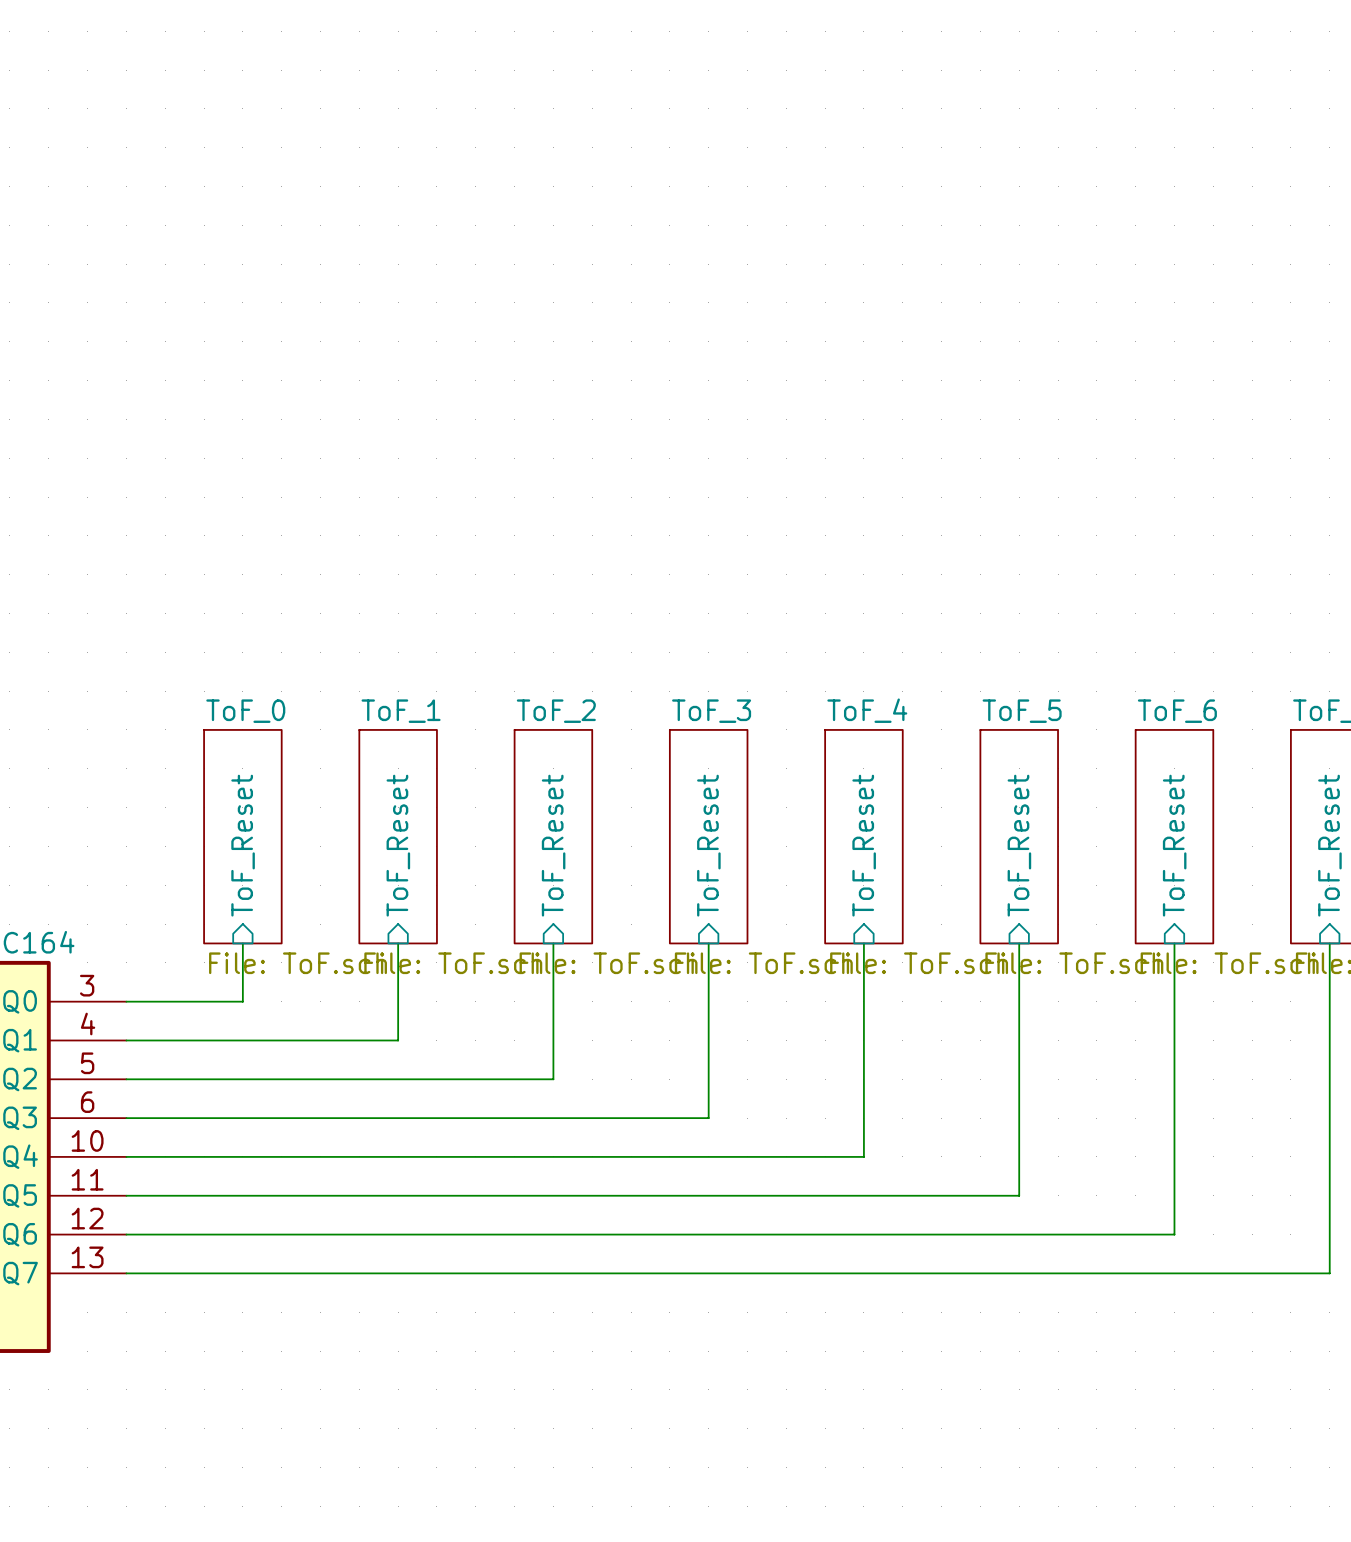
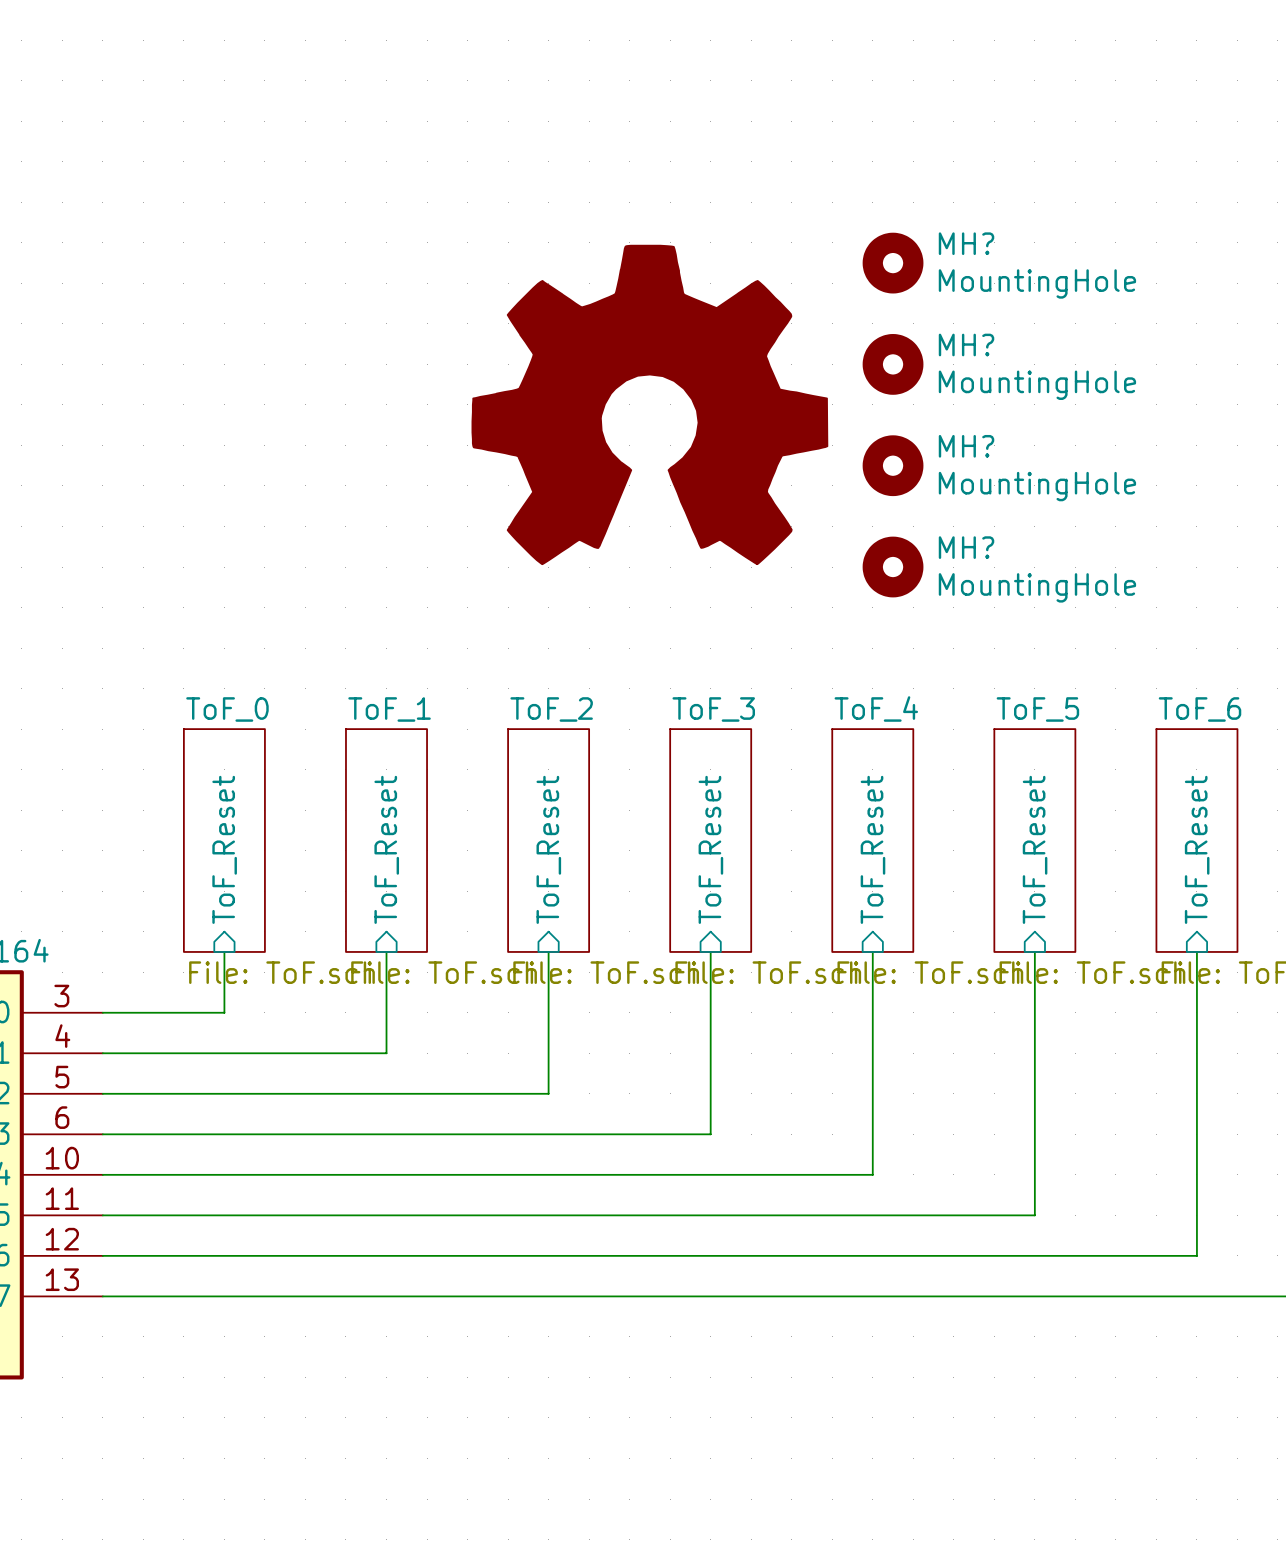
MH?: none -> MountingHole (893, 263)
MH?: none -> MountingHole (893, 364)
power symbol: none -> (649, 404)
MH?: none -> MountingHole (893, 465)
MH?: none -> MountingHole (893, 567)

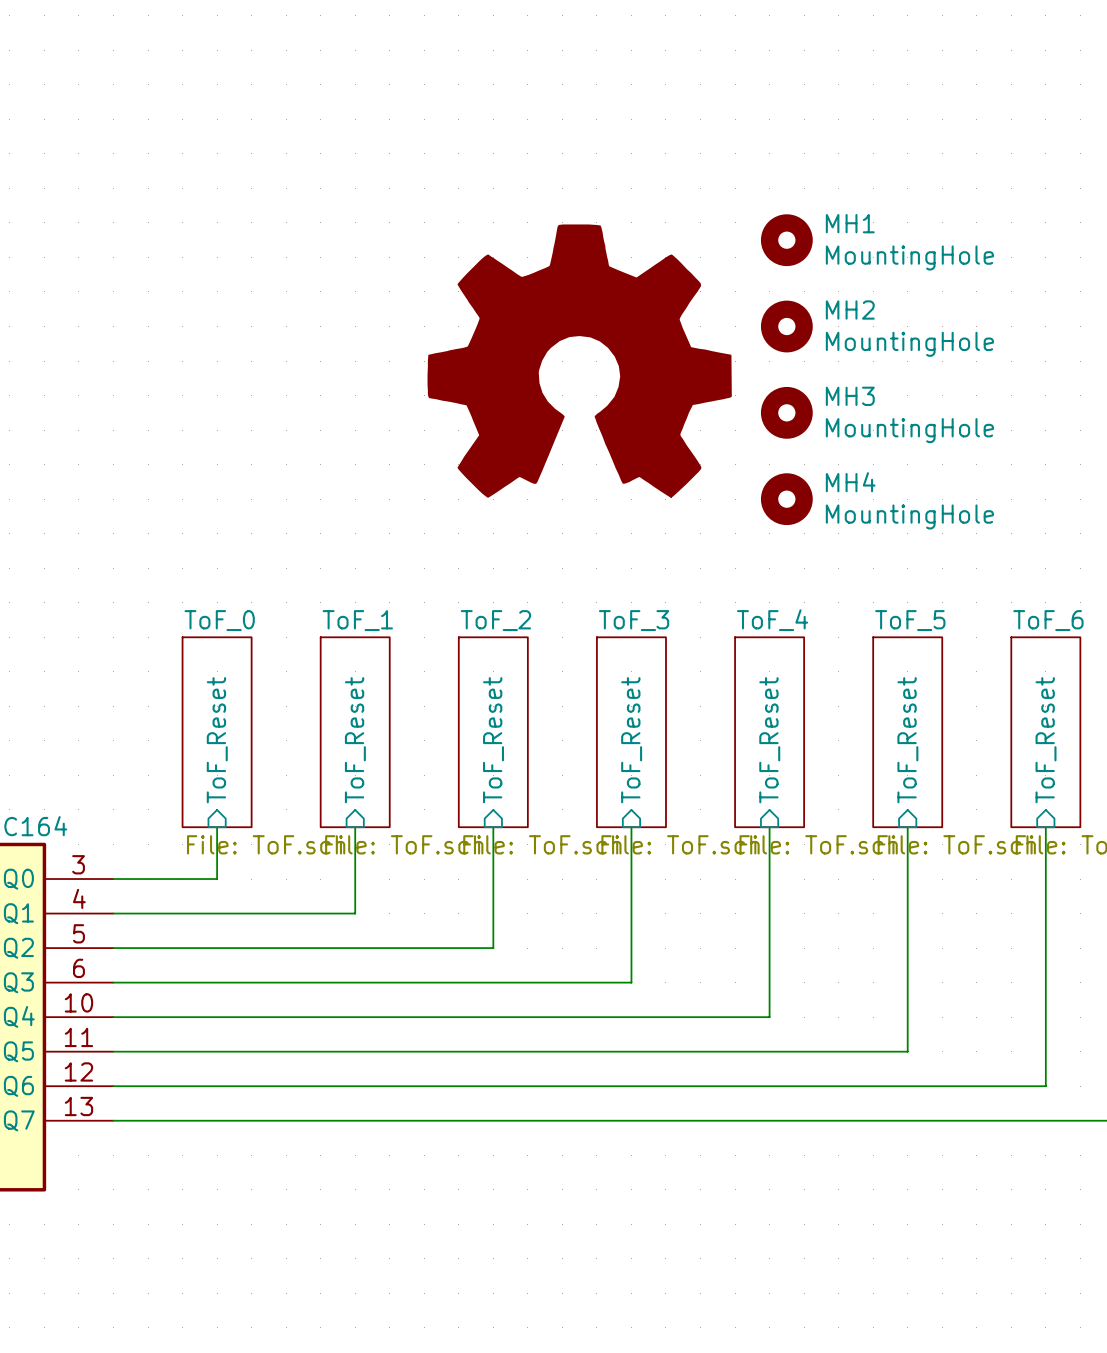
MH? name: MH? (966, 243) -> MH1 (850, 223)
MH? name: MH? (966, 345) -> MH2 (850, 309)
MH? name: MH? (966, 446) -> MH3 (850, 396)
MH? name: MH? (966, 547) -> MH4 (850, 482)

